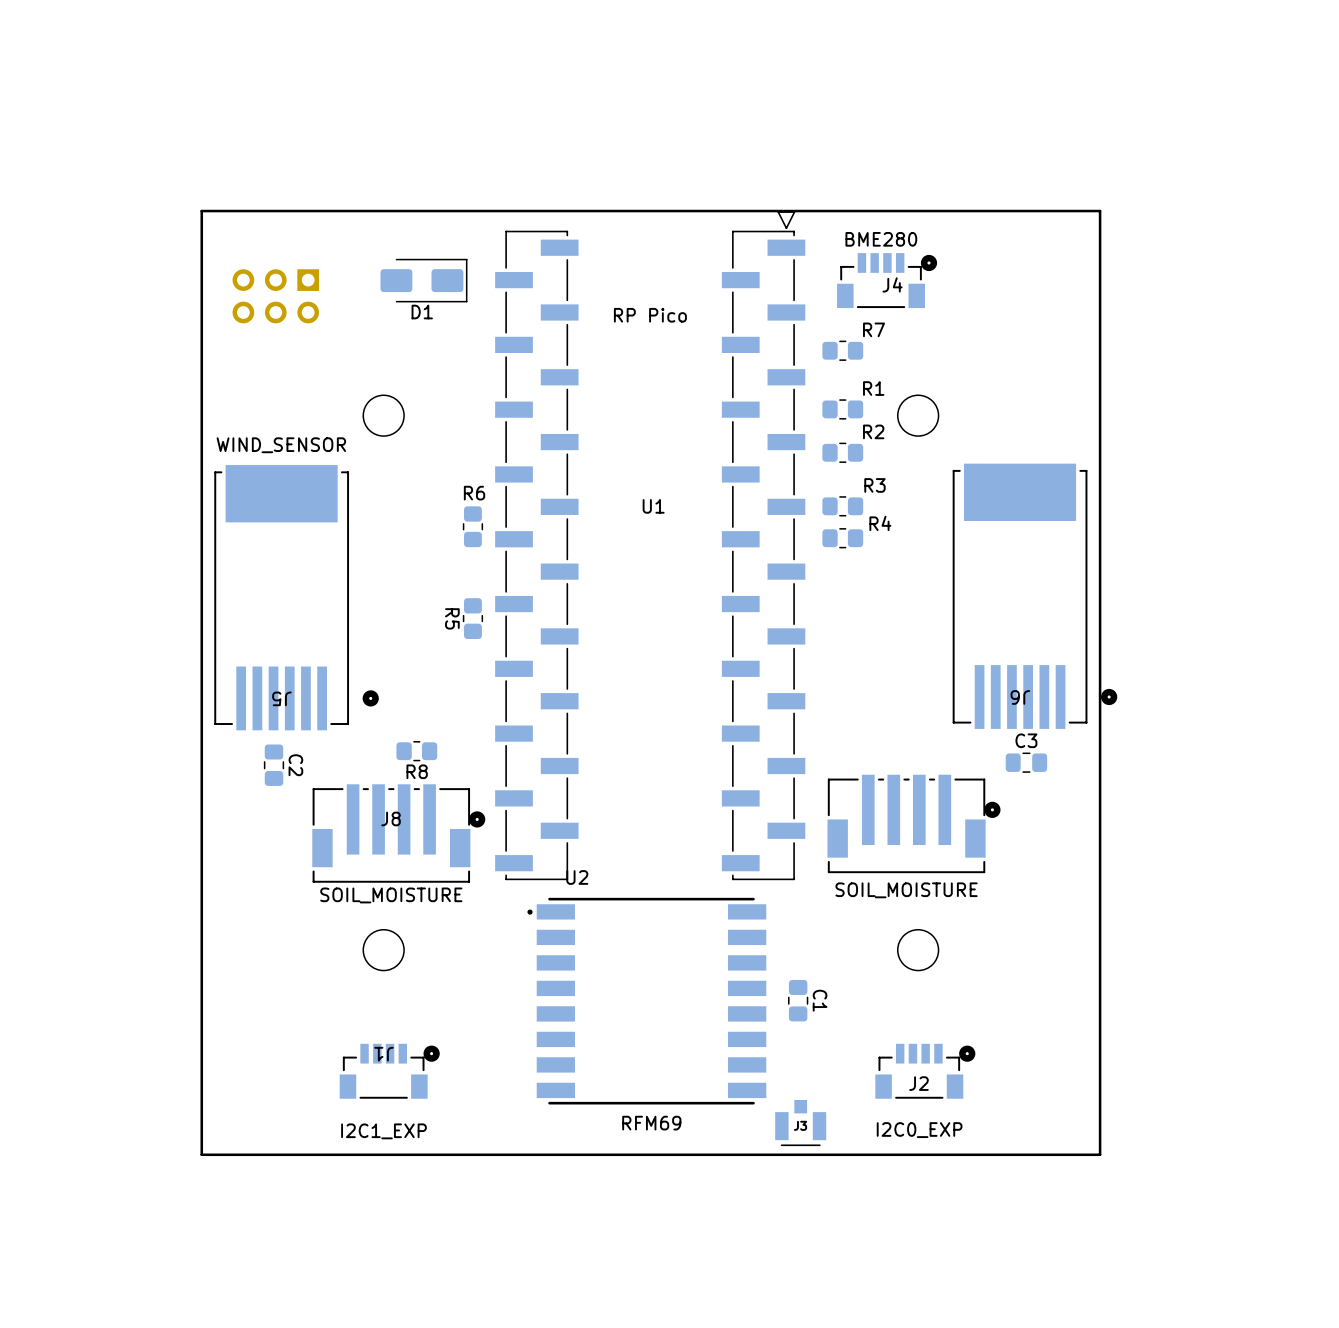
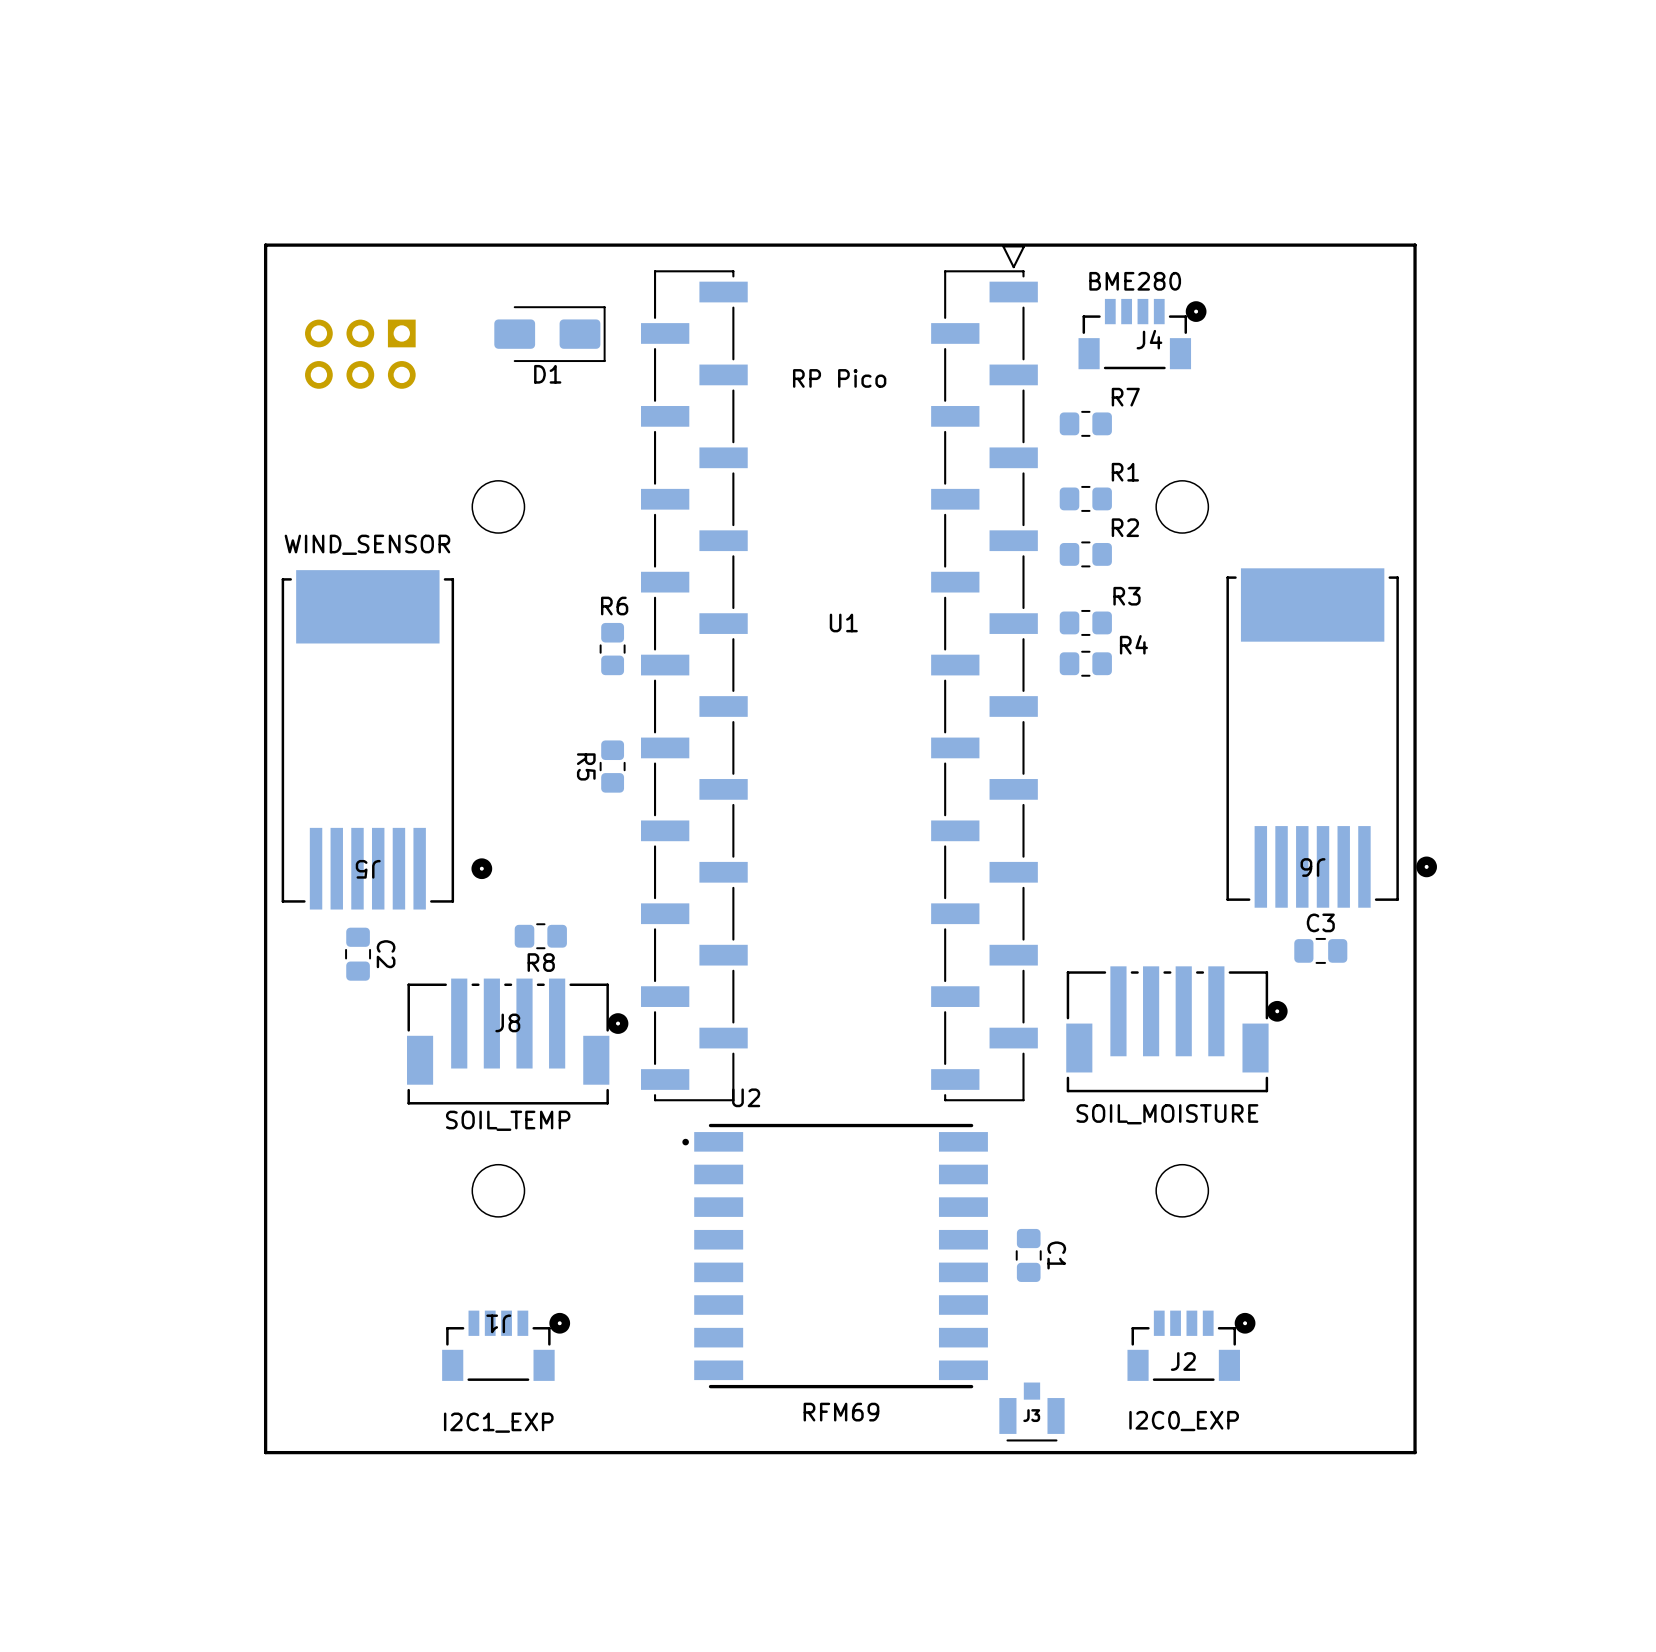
J8 value: SOIL_MOISTURE (391, 895) -> SOIL_TEMP (508, 1120)

